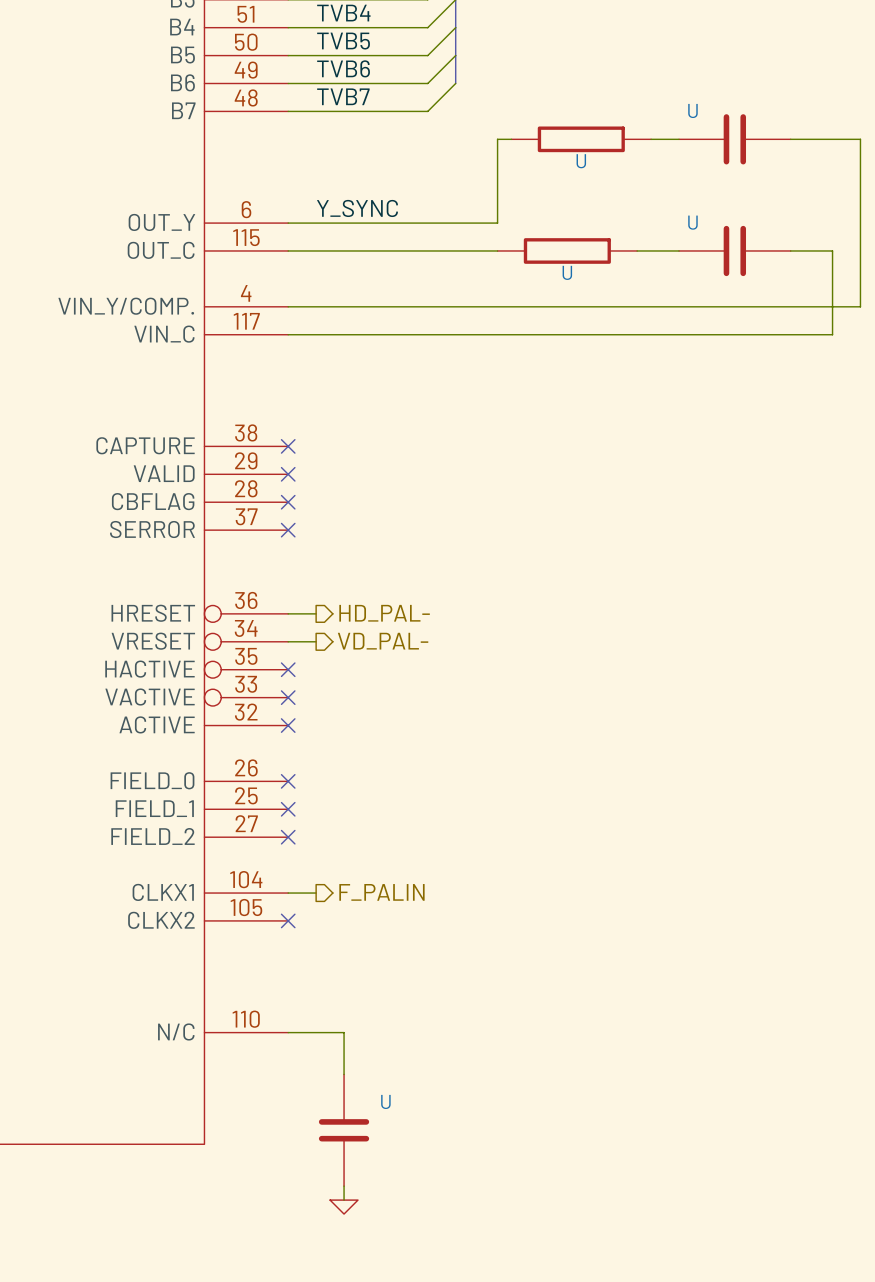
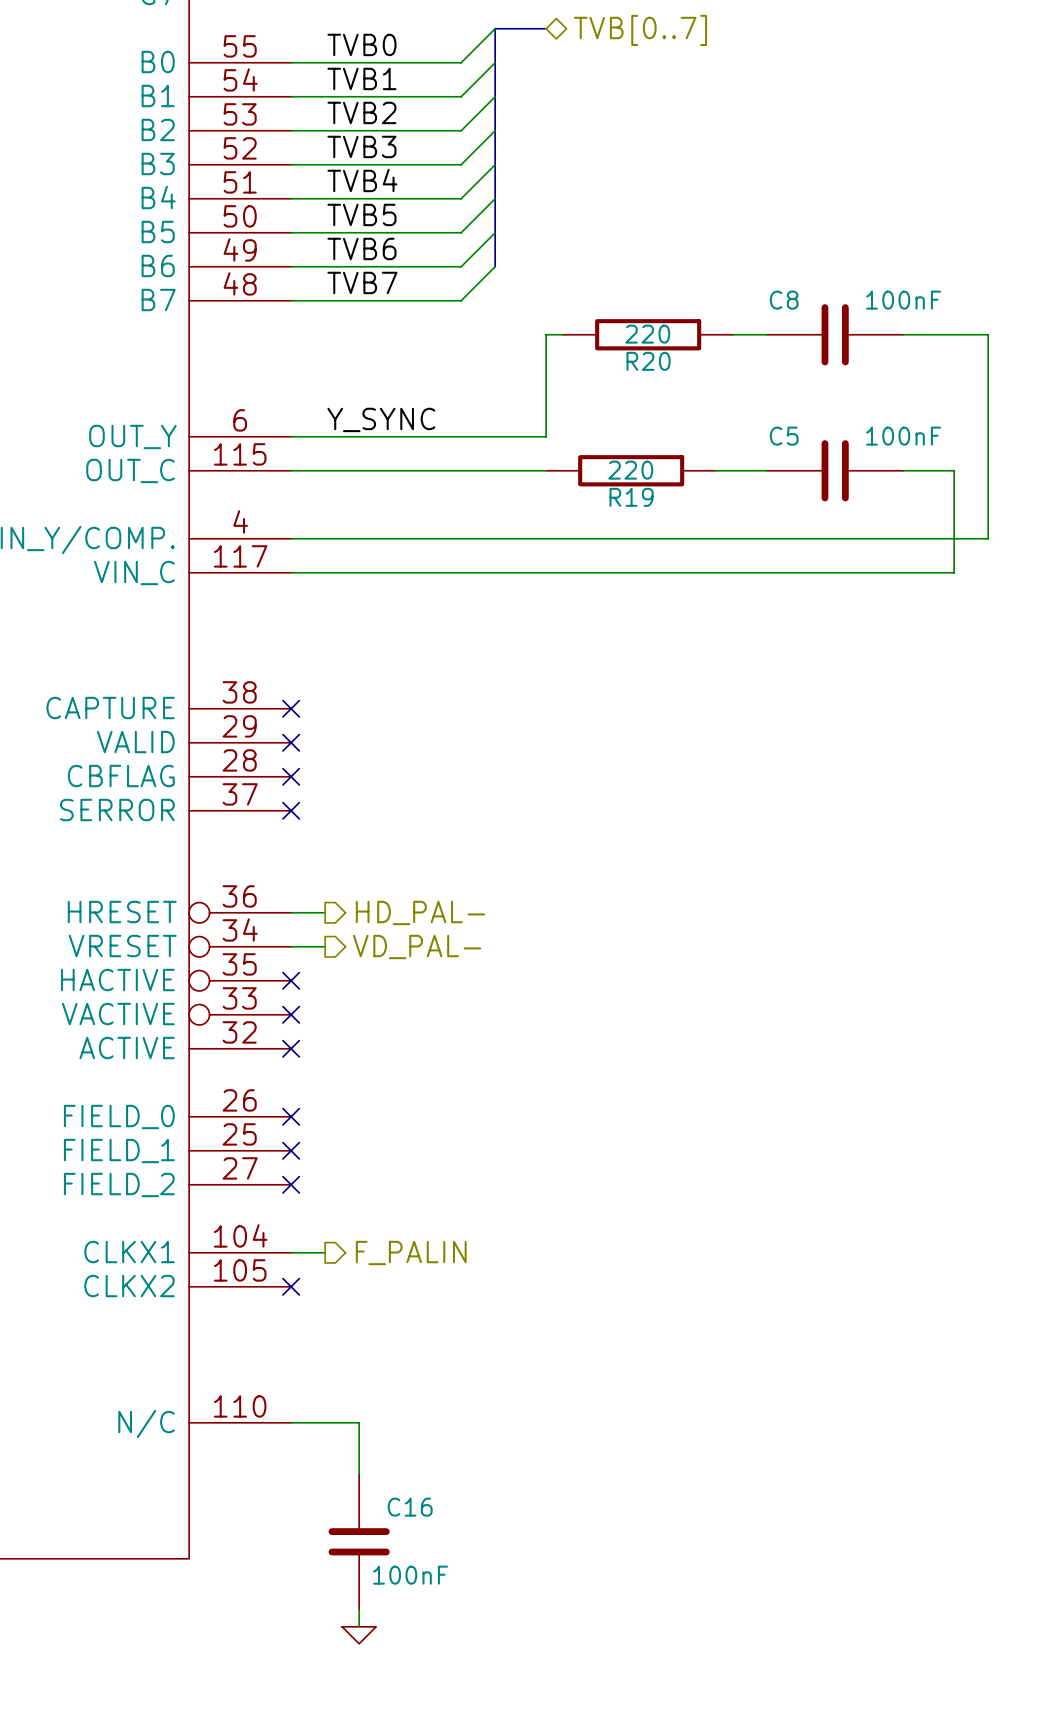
U name: U (692, 110) -> C8 (784, 300)
U value: none -> 100nF (903, 300)
U value: none -> 220 (647, 334)
U name: U (581, 161) -> R20 (648, 361)
U name: U (692, 222) -> C5 (784, 436)
U value: none -> 100nF (903, 436)
U value: none -> 220 (630, 470)
U name: U (567, 272) -> R19 (631, 497)
U name: U (385, 1101) -> C16 (410, 1507)
U value: none -> 100nF (410, 1575)

